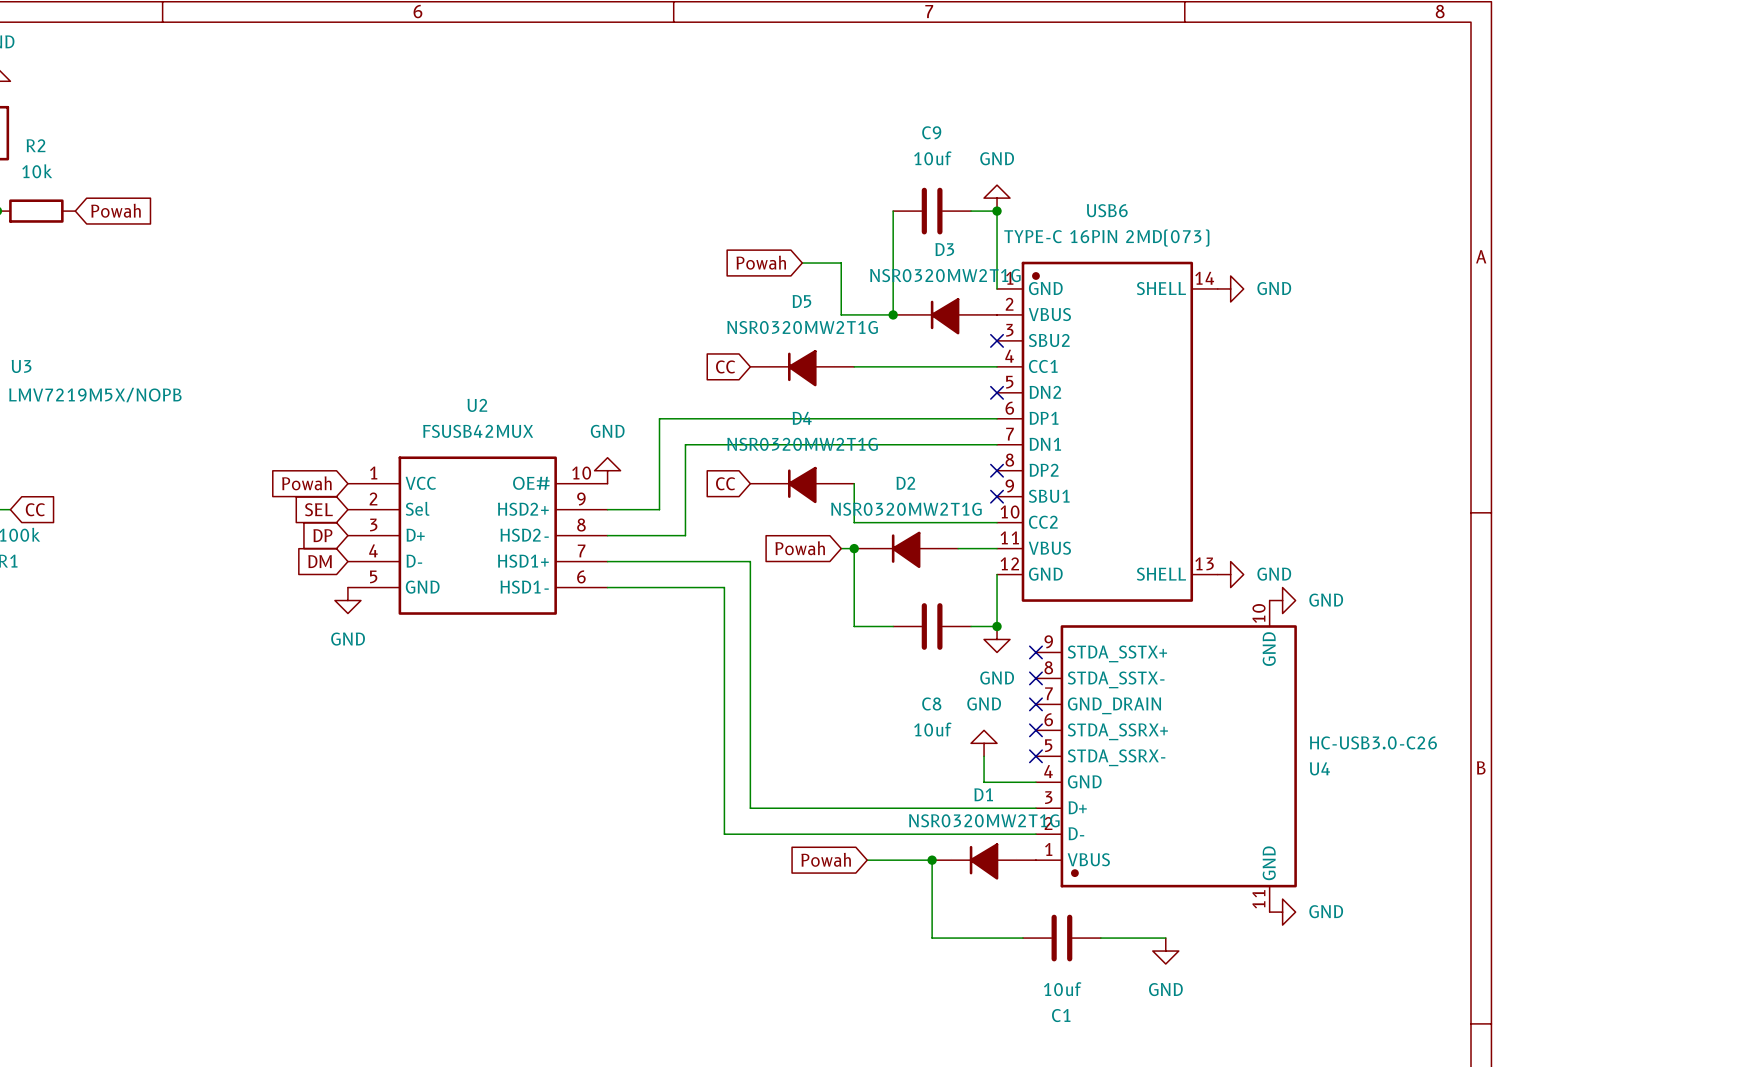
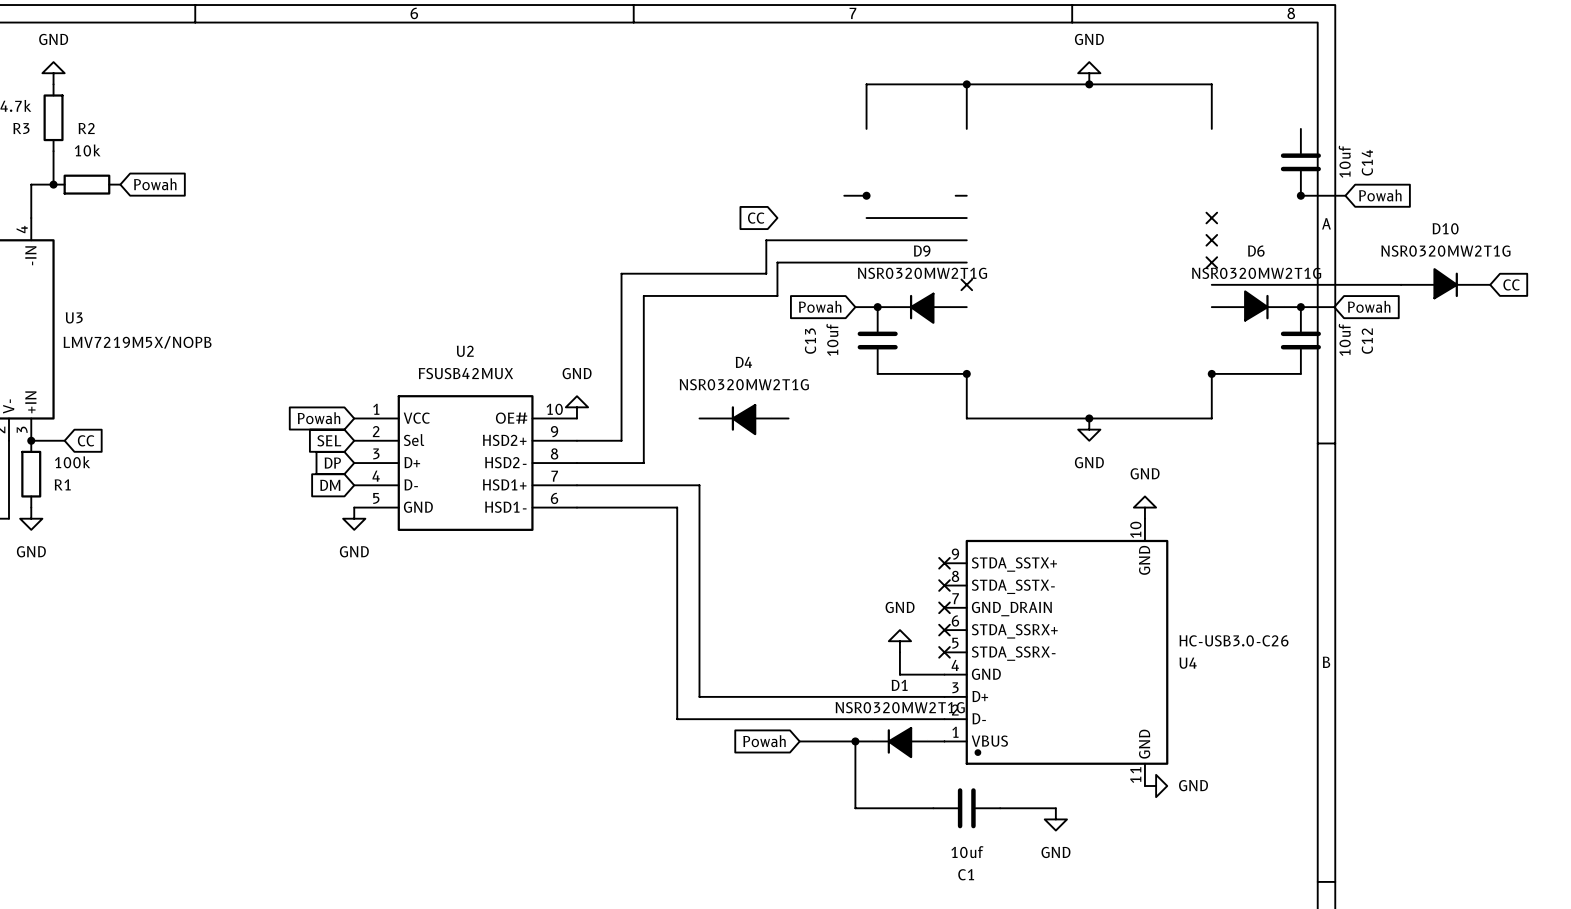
power symbol: none -> GND (1089, 73)
wire: none -> (966, 84) (966, 128)
junction: none -> (966, 84)
junction: none -> (1089, 84)
wire: none -> (866, 128) (866, 84) (1211, 84) (1211, 128)
C14: none -> 10uf (1300, 162)
power symbol: GND (997, 198) -> none
wire: (893, 211) (893, 314) (841, 314) -> none
C9: 10uf (932, 211) -> none
wire: (971, 211) (997, 211) (997, 288) -> none
junction: (997, 211) -> none
global label: none -> Powah (1380, 195)
wire: none -> (844, 195) (866, 195)
junction: none -> (866, 195)
wire: none -> (955, 195) (966, 195)
wire: none -> (1300, 195) (1345, 195)
junction: none -> (1300, 195)
global label: none -> CC (756, 218)
wire: none -> (866, 218) (966, 218)
no-connect mark: none -> (1211, 218)
global label: Powah (761, 262) -> none
wire: (802, 263) (841, 263) (841, 301) -> (966, 262) (777, 262)
no-connect mark: none -> (1211, 240)
power symbol: GND (1230, 288) -> none
no-connect mark: none -> (1211, 262)
junction: (893, 314) -> none
D3: NSR0320MW2T1G (945, 316) -> none
D10: none -> NSR0320MW2T1G (1445, 283)
no-connect mark: none -> (966, 284)
wire: none -> (1211, 284) (1401, 284)
global label: none -> CC (1511, 284)
no-connect mark: (997, 340) -> none
D6: none -> NSR0320MW2T1G (1256, 306)
global label: none -> Powah (820, 306)
wire: none -> (855, 307) (877, 307)
junction: none -> (877, 307)
wire: none -> (1300, 307) (1334, 307)
junction: none -> (1300, 307)
global label: none -> Powah (1369, 306)
D9: none -> NSR0320MW2T1G (922, 308)
global label: CC (725, 366) -> none
wire: (854, 366) (997, 366) -> none
D5: NSR0320MW2T1G (802, 368) -> none
C13: none -> 10uf (877, 340)
no-connect mark: (997, 392) -> none
C12: none -> 10uf (1300, 340)
wire: (659, 418) (997, 418) -> (621, 362) (621, 273) (766, 273) (766, 240) (966, 240)
wire: none -> (877, 373) (966, 373) (966, 418) (1211, 418) (1211, 373) (1300, 373)
junction: none -> (966, 373)
USB6: TYPE-C 16PIN 2MD(073) (1107, 431) -> none
junction: none -> (1211, 373)
wire: (685, 444) (997, 444) -> (643, 385) (643, 295) (777, 295) (777, 273)
no-connect mark: (997, 470) -> none
global label: CC (725, 483) -> none
wire: (854, 483) (854, 522) (997, 522) -> none
junction: none -> (1089, 418)
no-connect mark: (997, 496) -> none
power symbol: none -> GND (1089, 429)
global label: Powah (800, 548) -> none
wire: (841, 548) (854, 548) (854, 626) (893, 626) -> none
junction: (854, 548) -> none
wire: (958, 548) (997, 548) -> none
D2: NSR0320MW2T1G (906, 549) -> none
wire: (997, 574) (997, 626) (971, 626) -> none
power symbol: GND (1230, 574) -> none
power symbol rotation: 0° (1282, 600) -> 90° counterclockwise (1144, 507)
power symbol position: GND (1282, 600) -> GND (1144, 507)
C8: 10uf (932, 626) -> none
junction: (997, 626) -> none
power symbol: GND (997, 639) -> none

